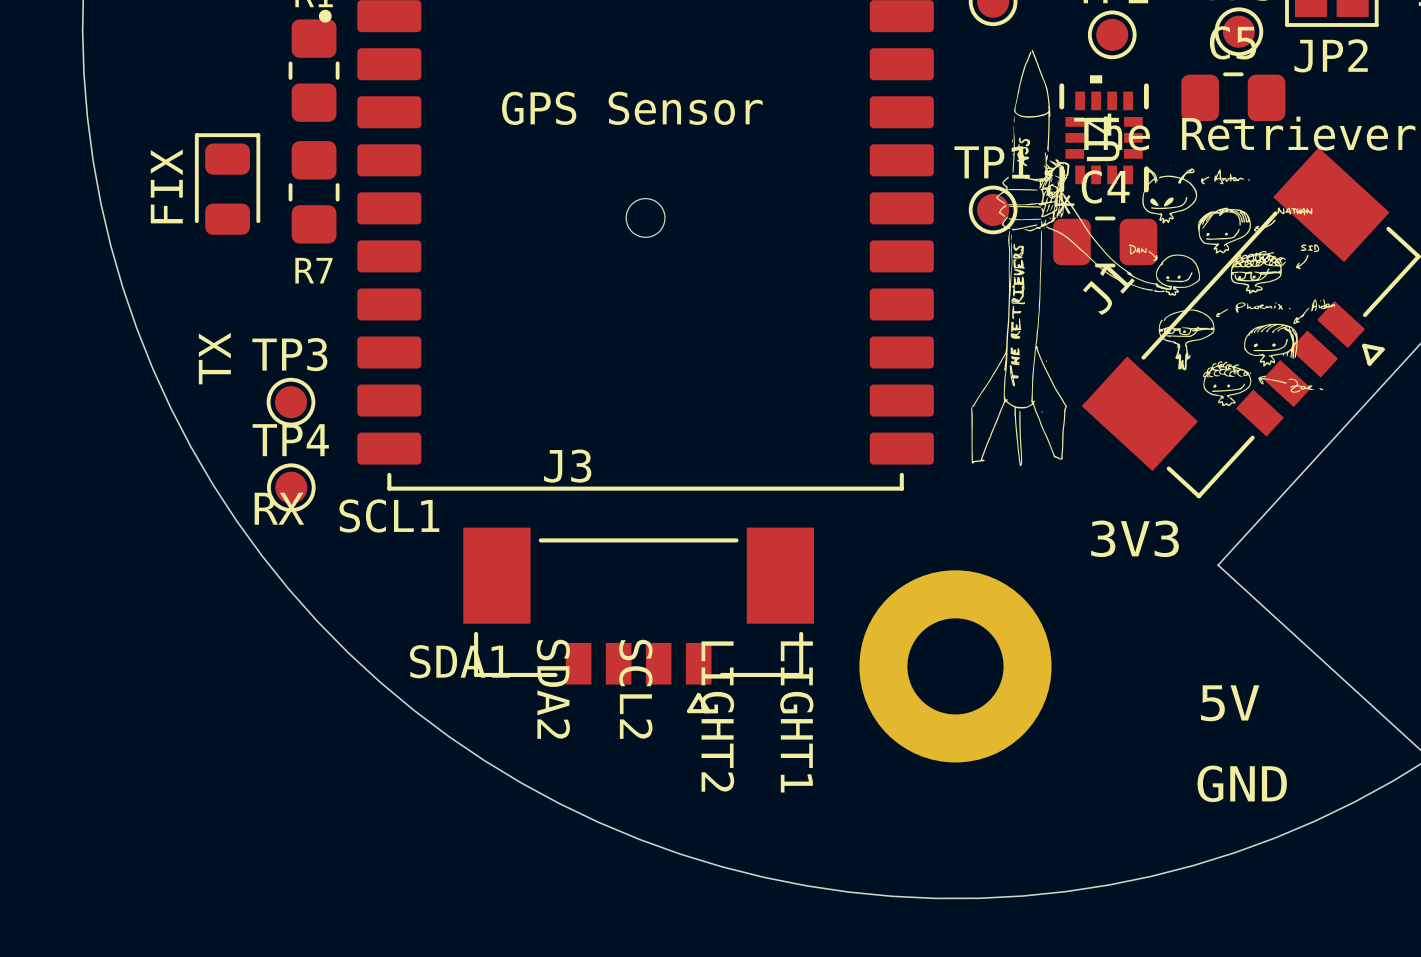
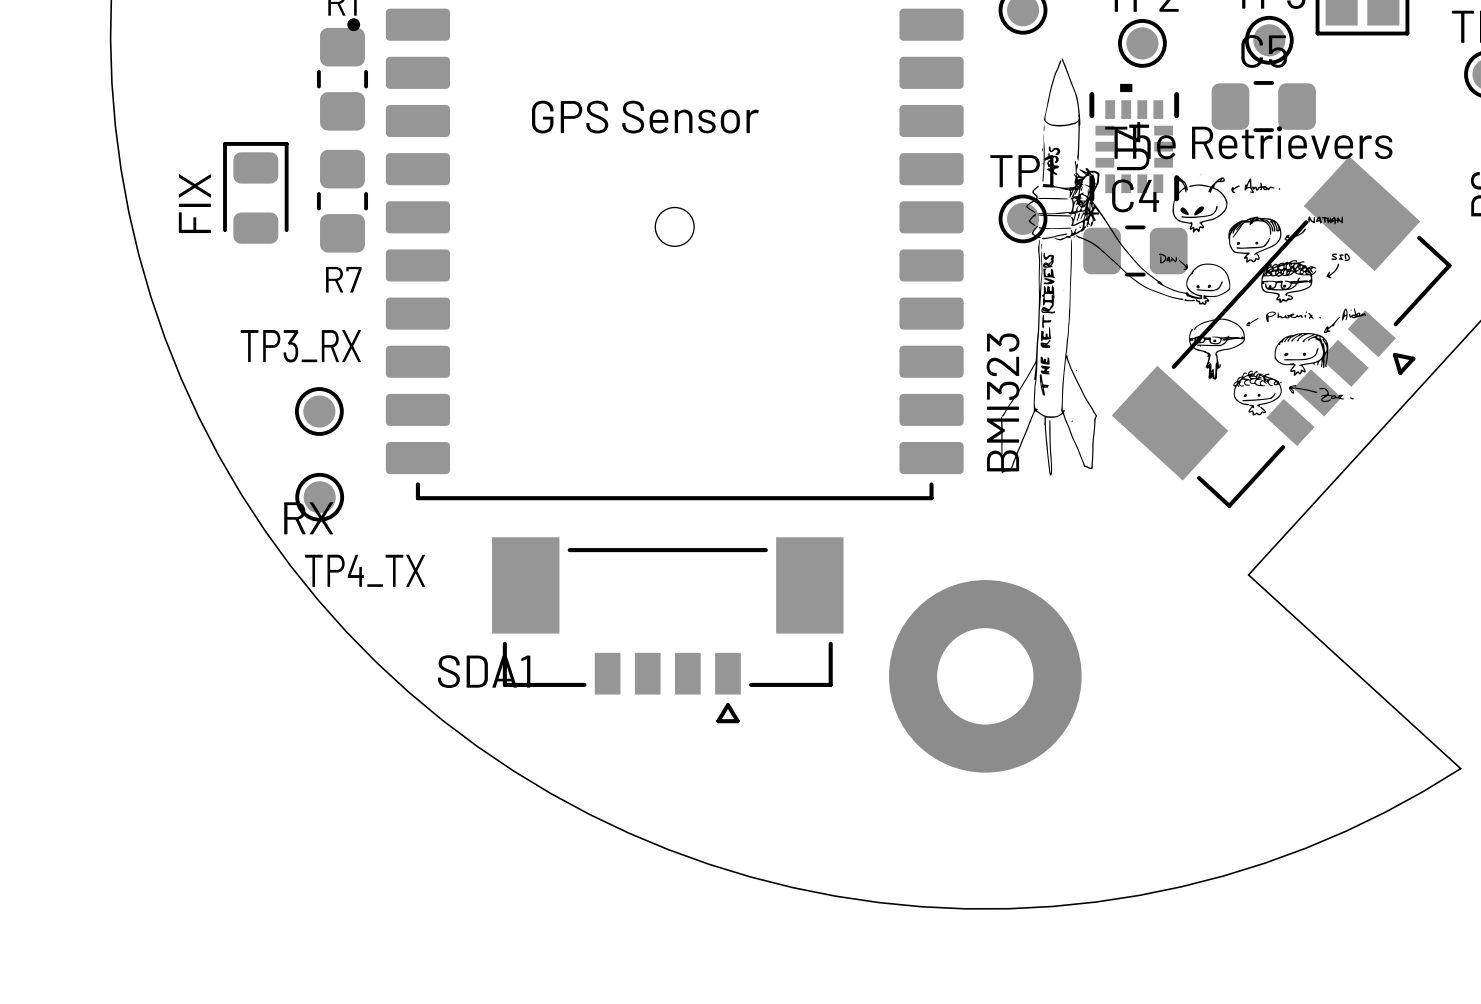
JP2 name: JP2 (1331, 55) -> none
J1 name: J1 (1108, 289) -> none
TP3 name: TP3 (289, 354) -> TP3_RX (300, 346)
text: TX (214, 358) -> none
text: none -> BMI323 (1003, 402)
TP4 name: TP4 (290, 440) -> TP4_TX (365, 570)
J3 name: J3 (567, 466) -> none
text: SCL1 (389, 515) -> none
text: 3V3 (1135, 538) -> none
text: SDA2 (553, 689) -> none
text: SCL2 (635, 689) -> none
text: 5V (1230, 703) -> none
text: LIGHT2 (717, 716) -> none
text: LIGHT1 (796, 716) -> none
text: GND (1242, 783) -> none

